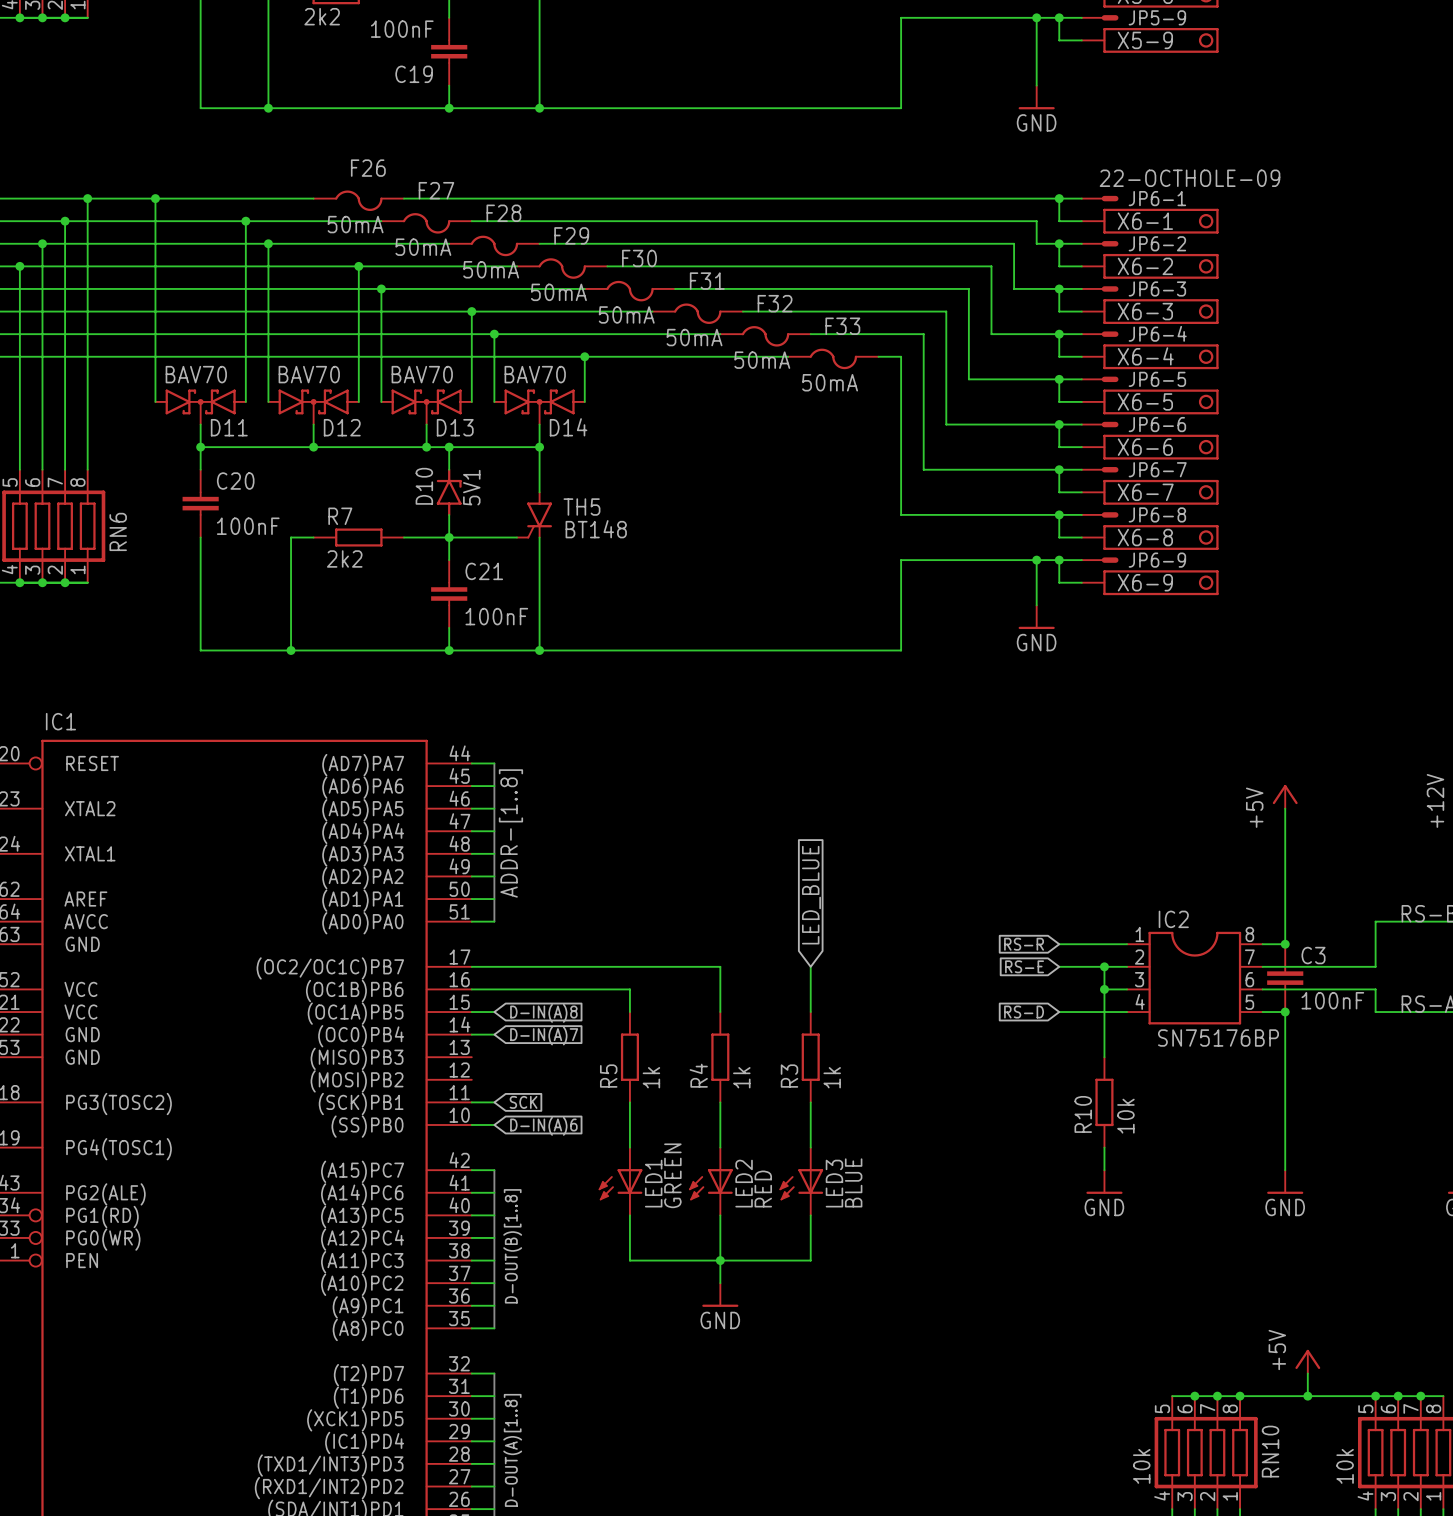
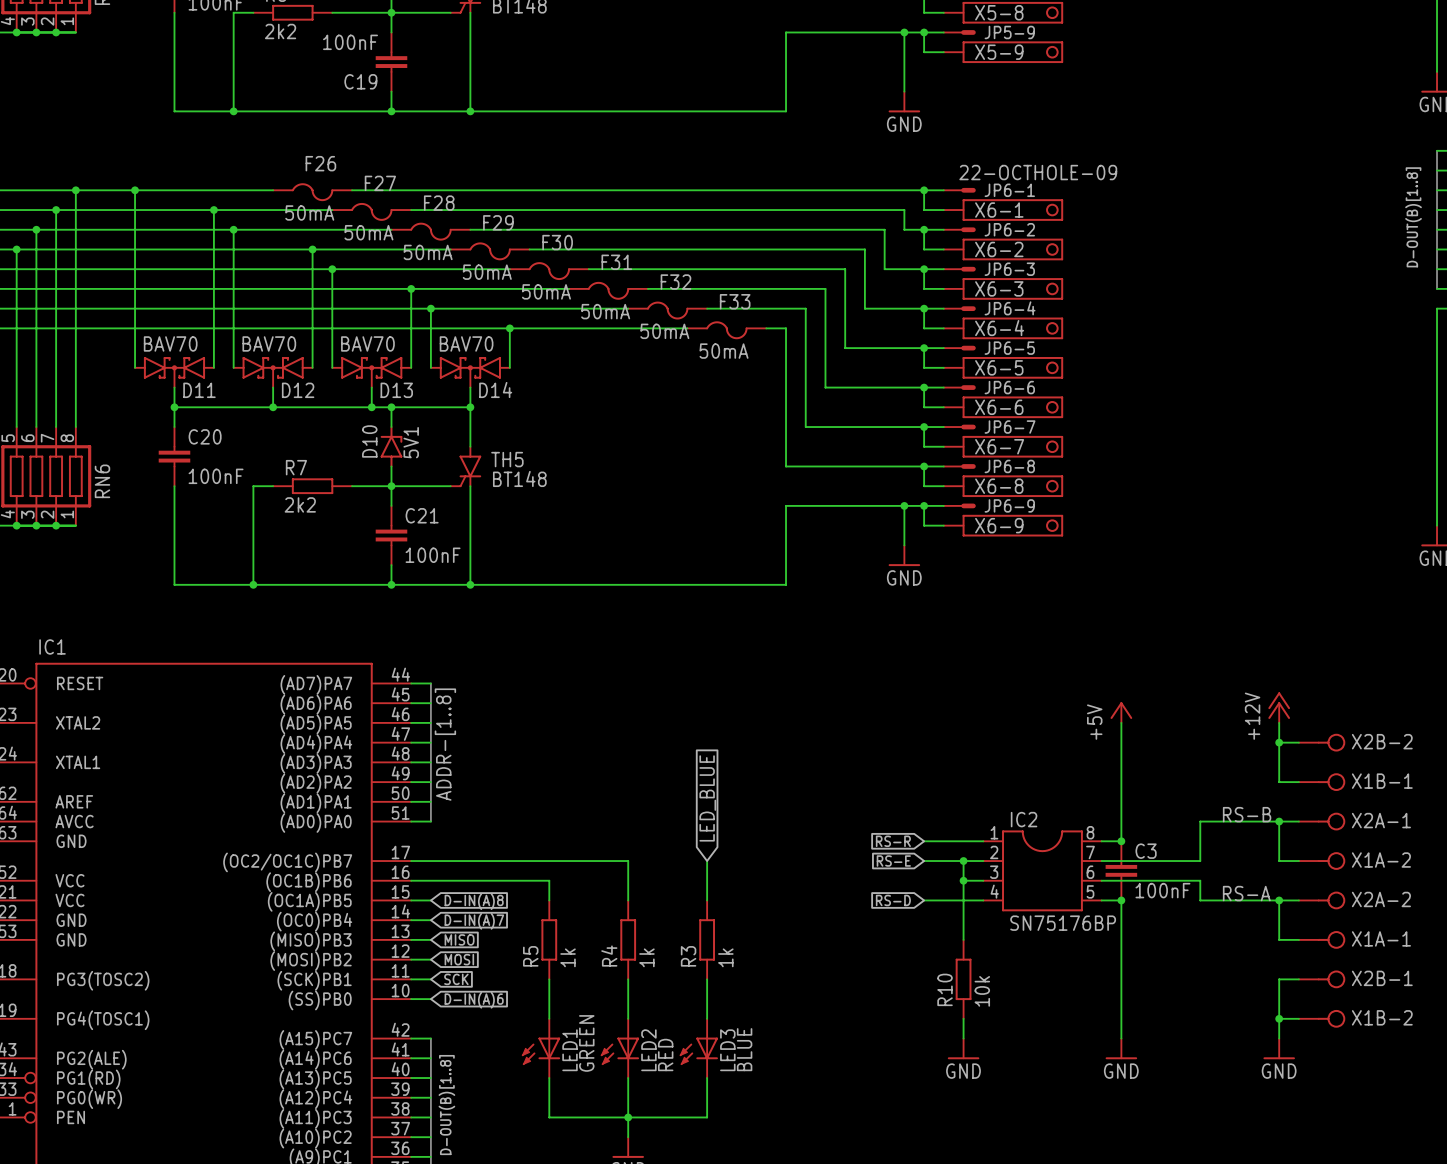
wire: none -> (411, 939) (430, 939)
global label: none -> MISO (459, 939)
wire: none -> (411, 959) (430, 959)
global label: none -> MOSI (459, 959)

